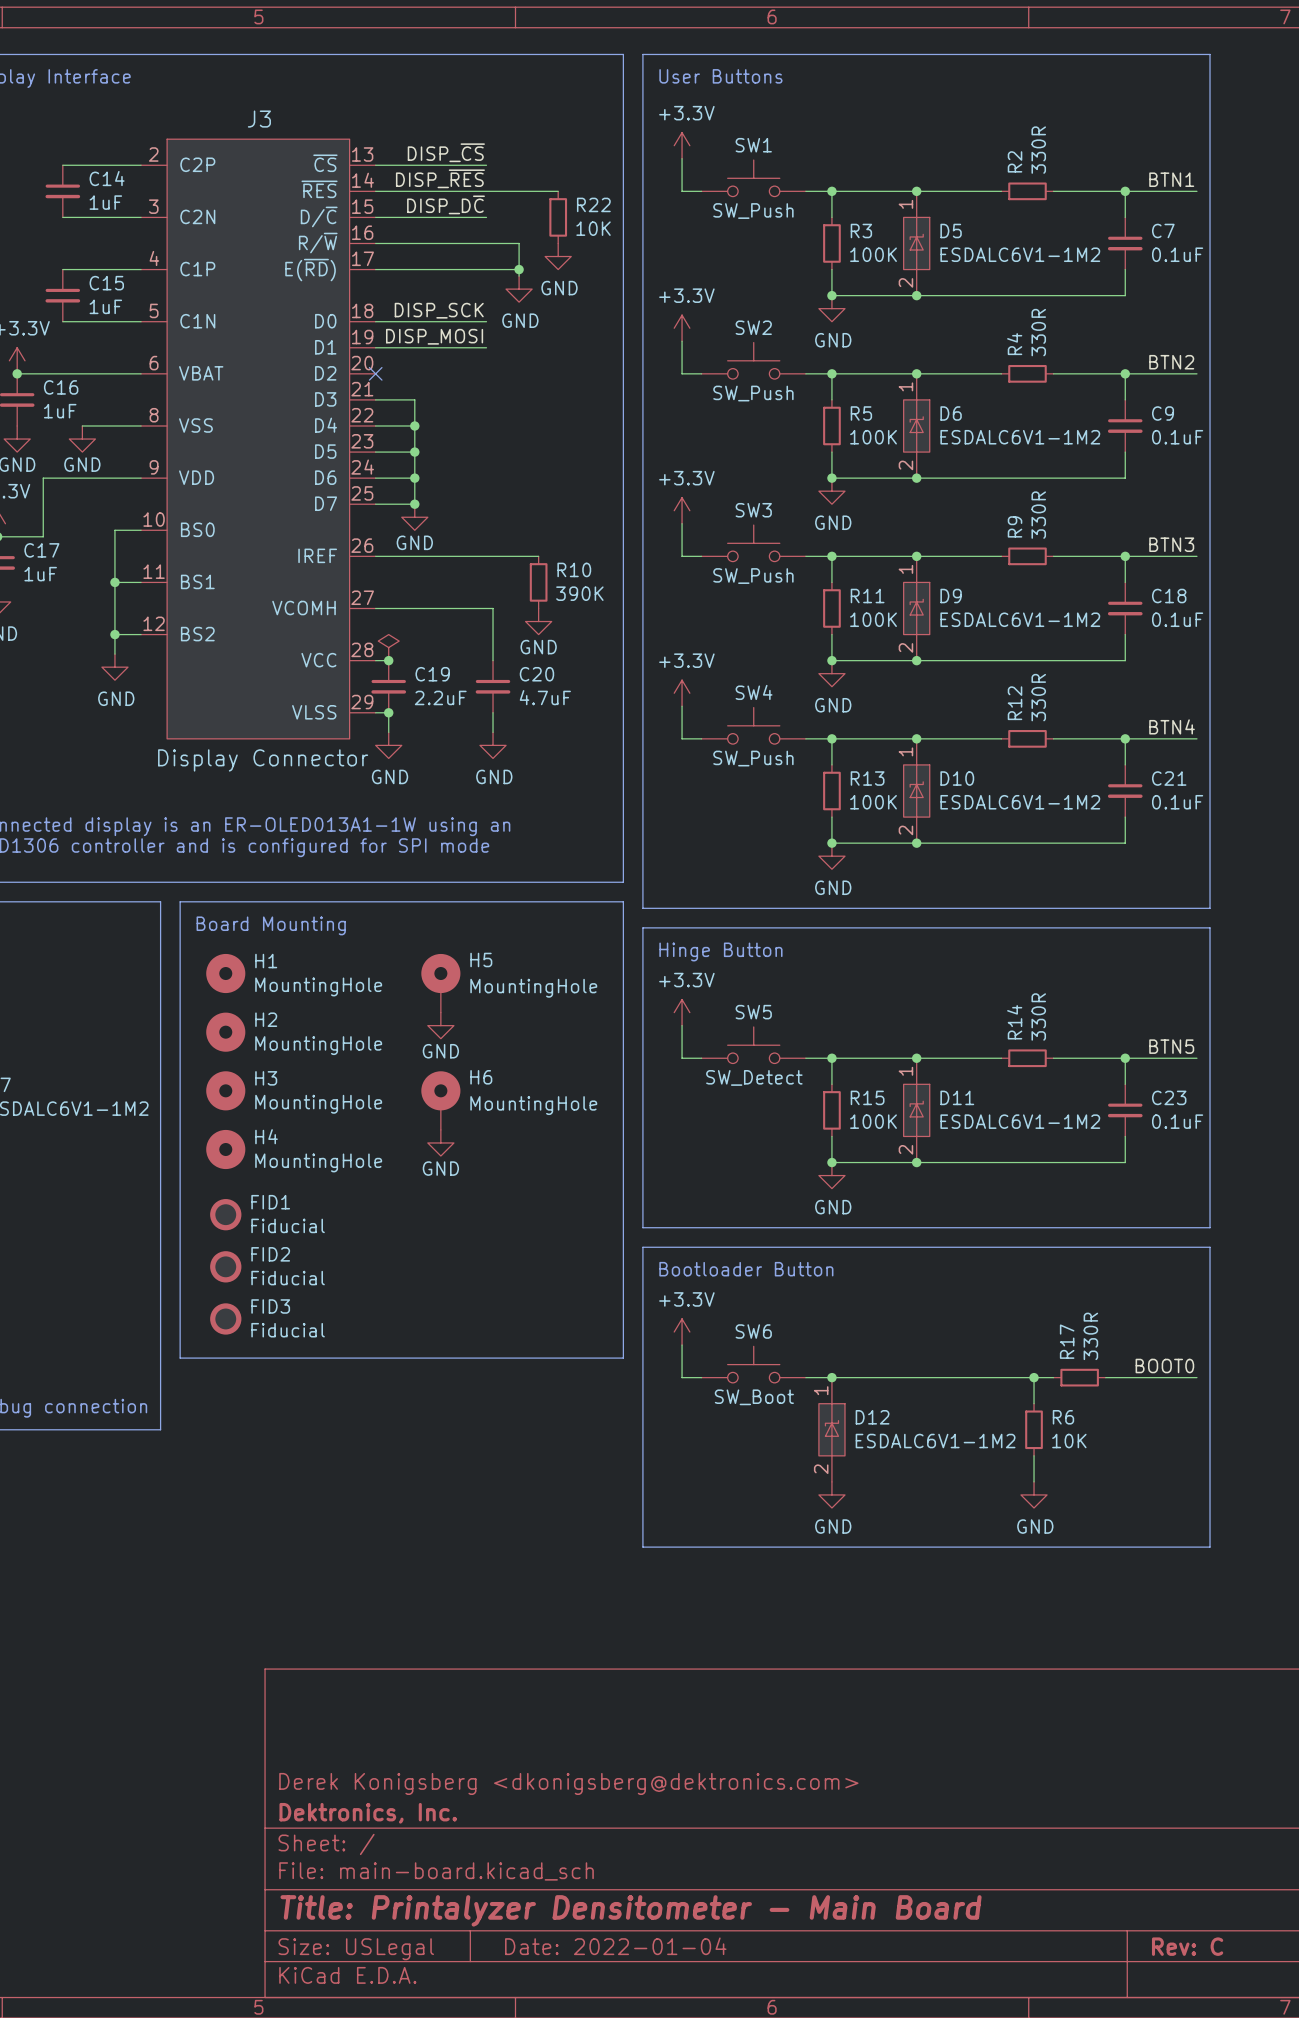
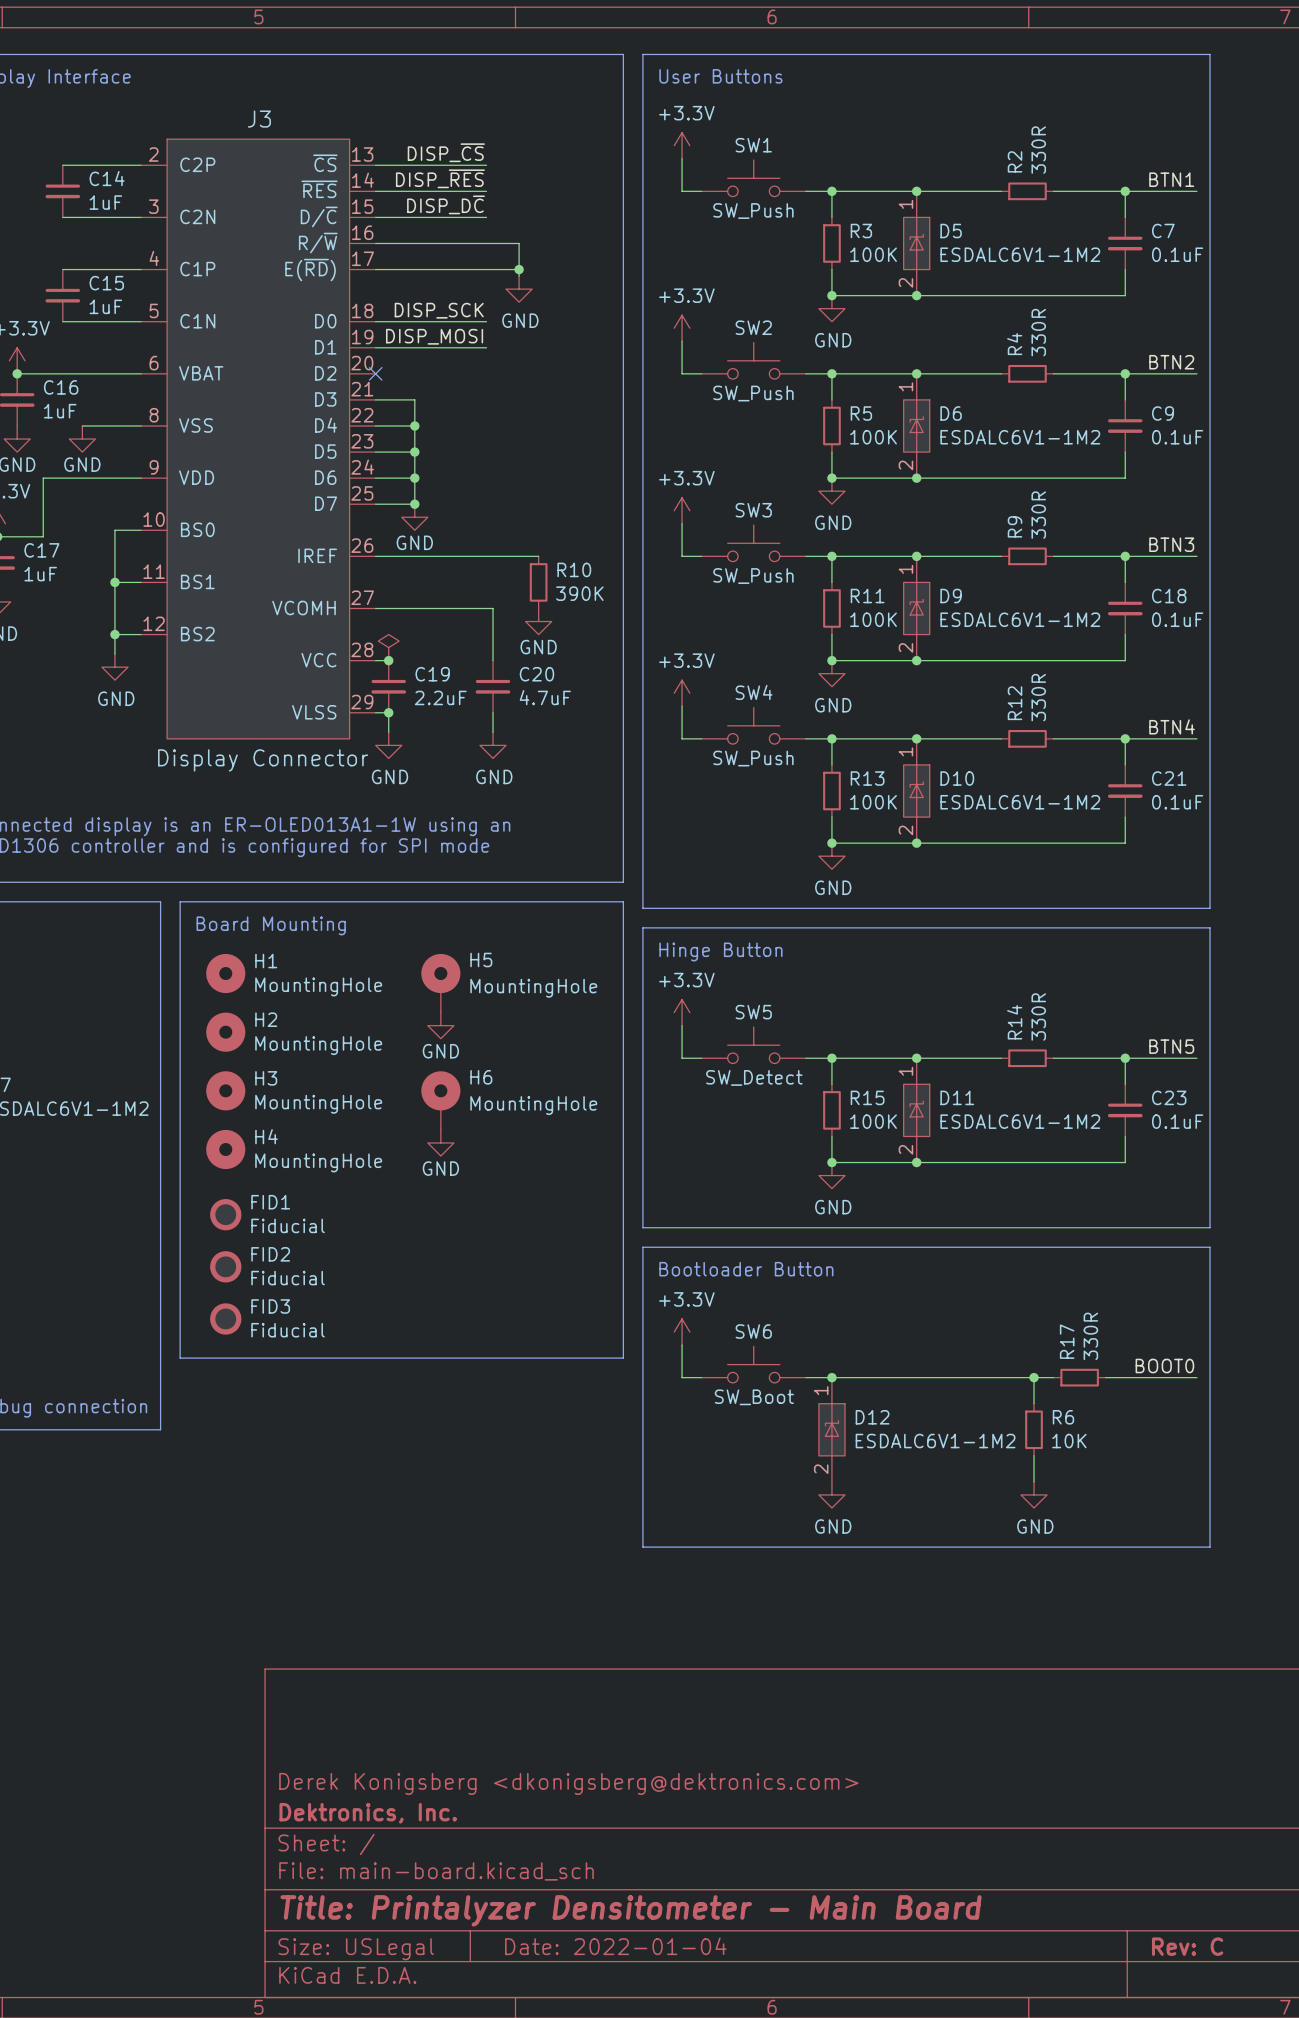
wire: (486, 191) (558, 191) -> none
R22: 10K (558, 217) -> none
power symbol: GND (558, 256) -> none

